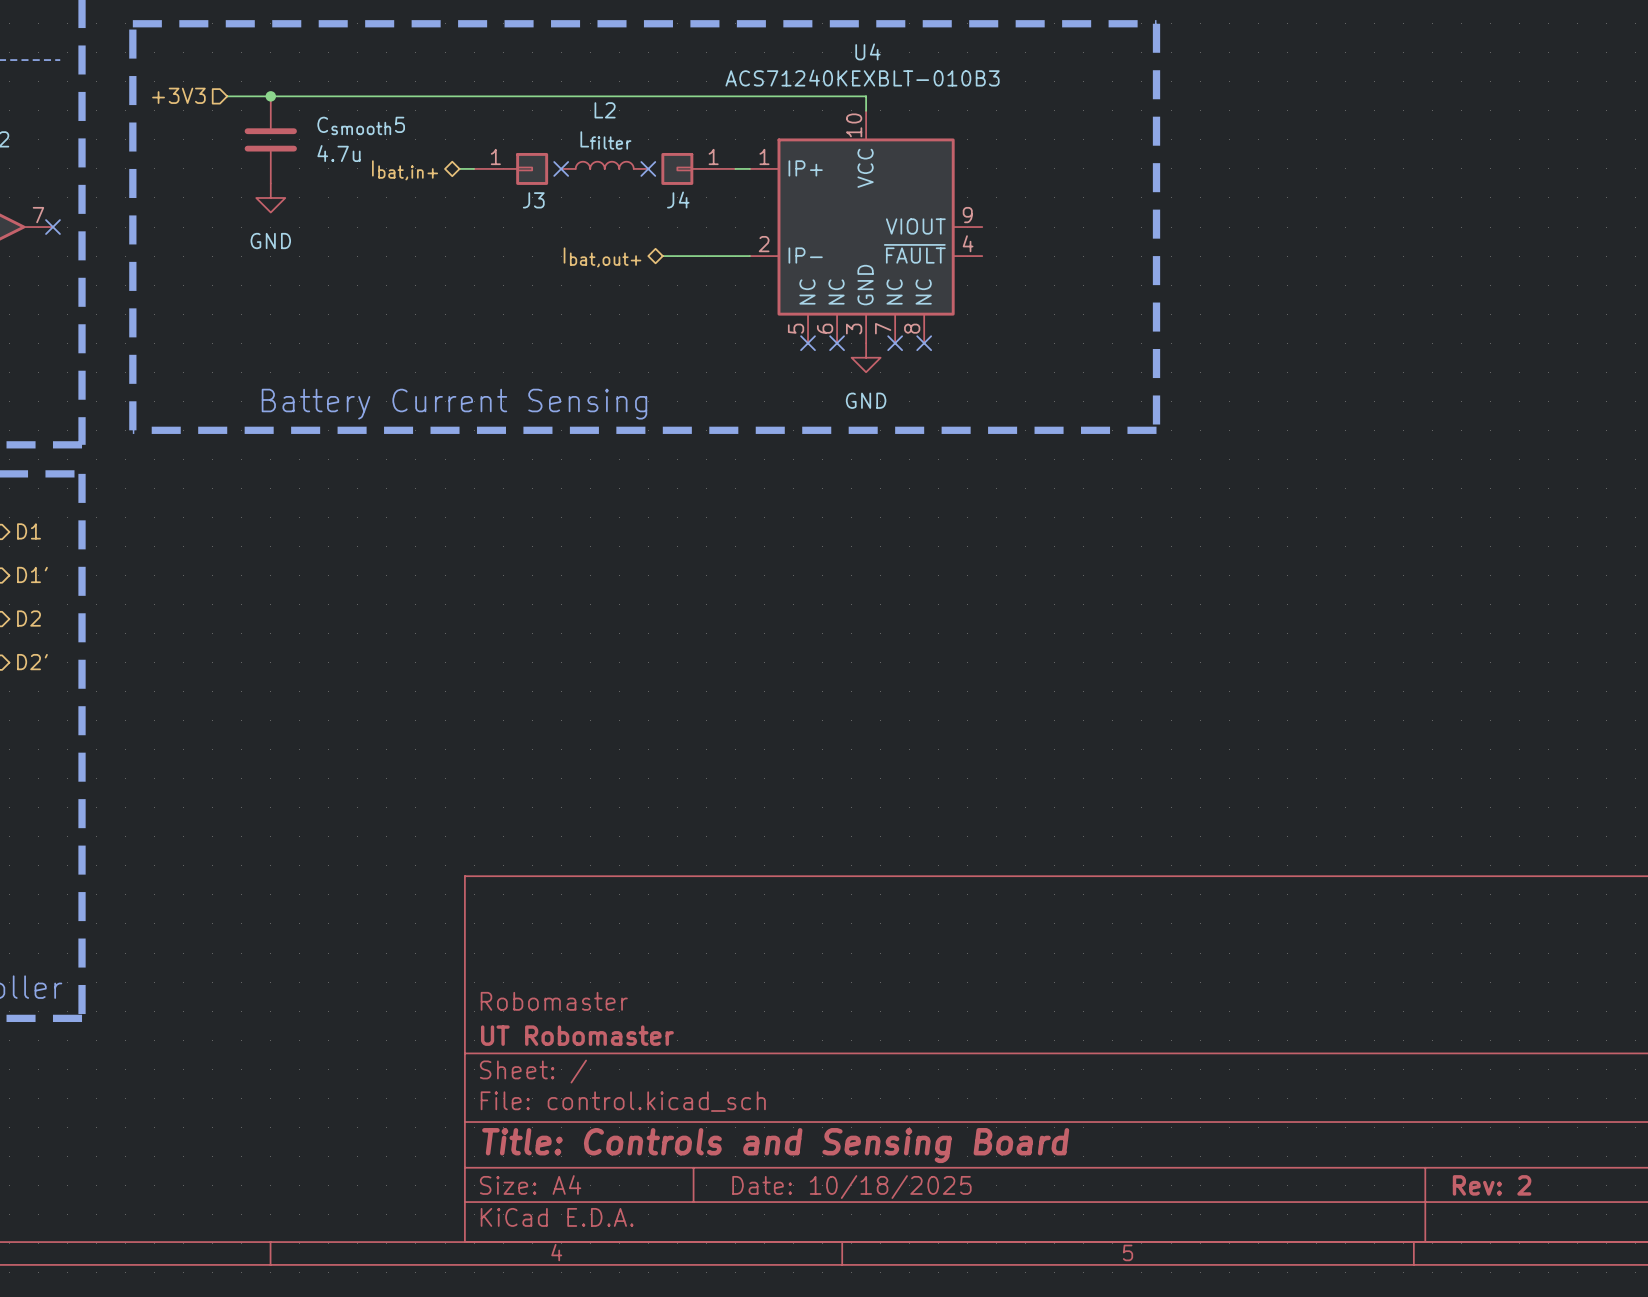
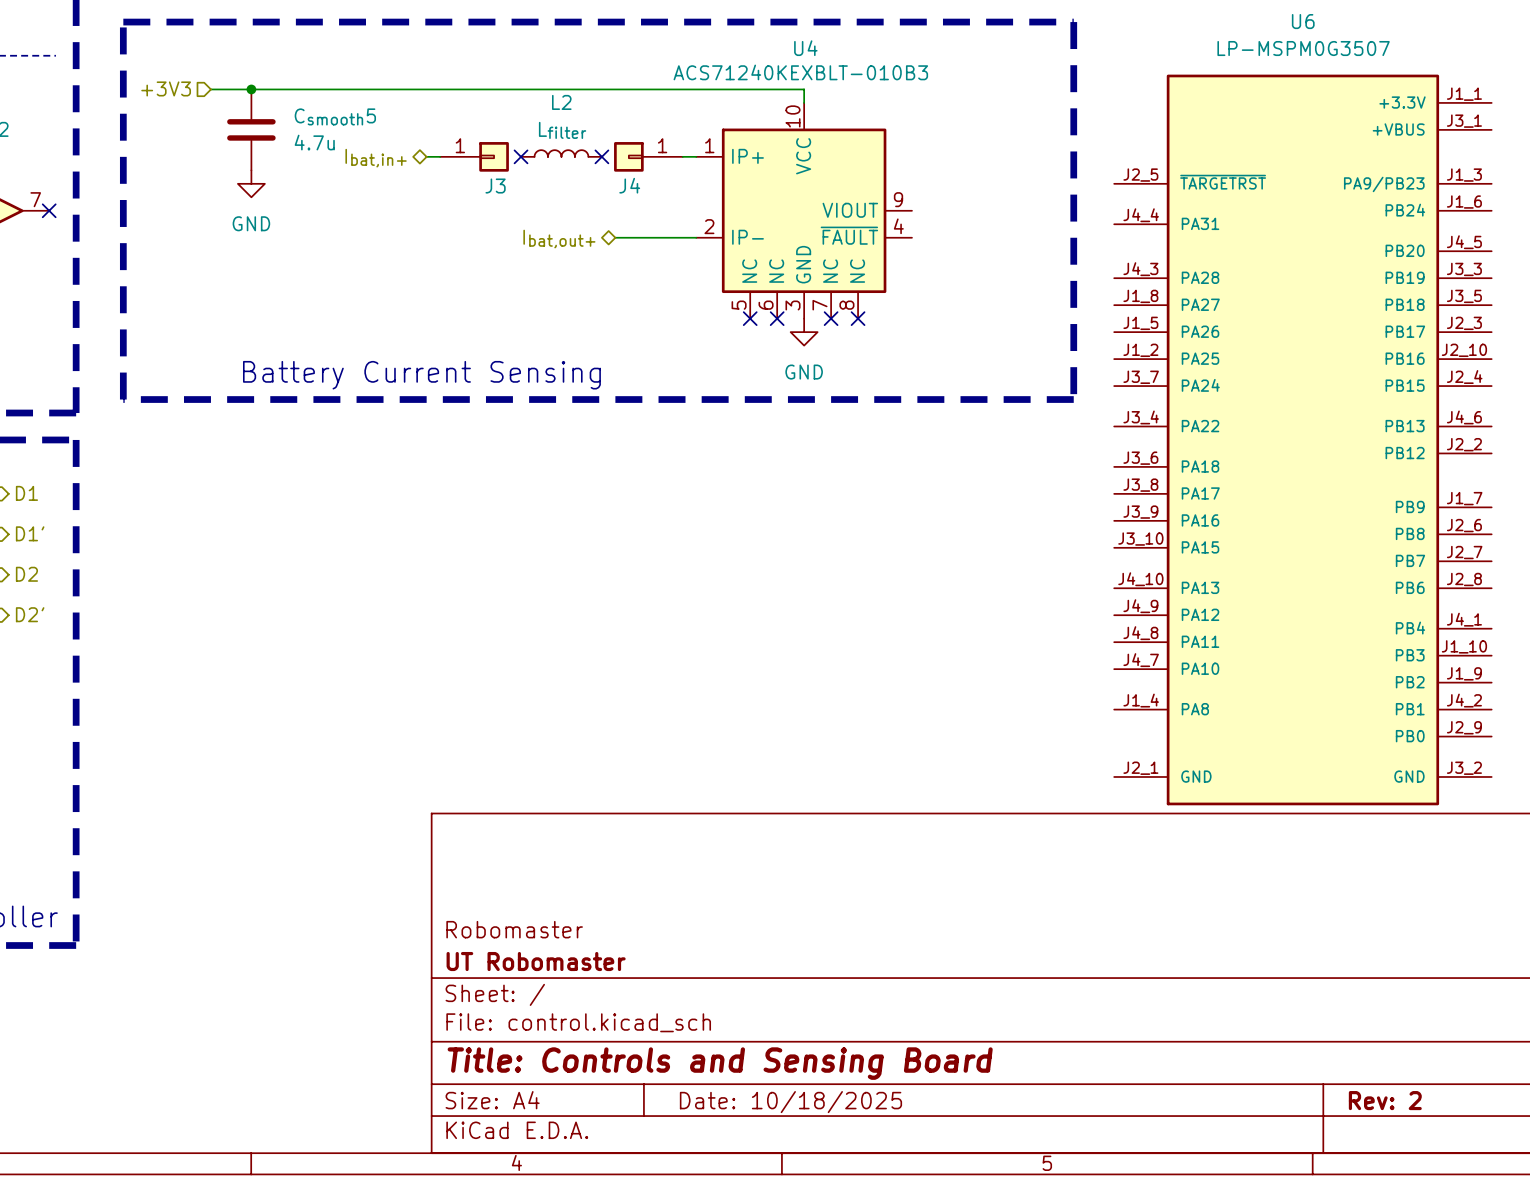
U6: none -> LP-MSPM0G3507 (1302, 439)

